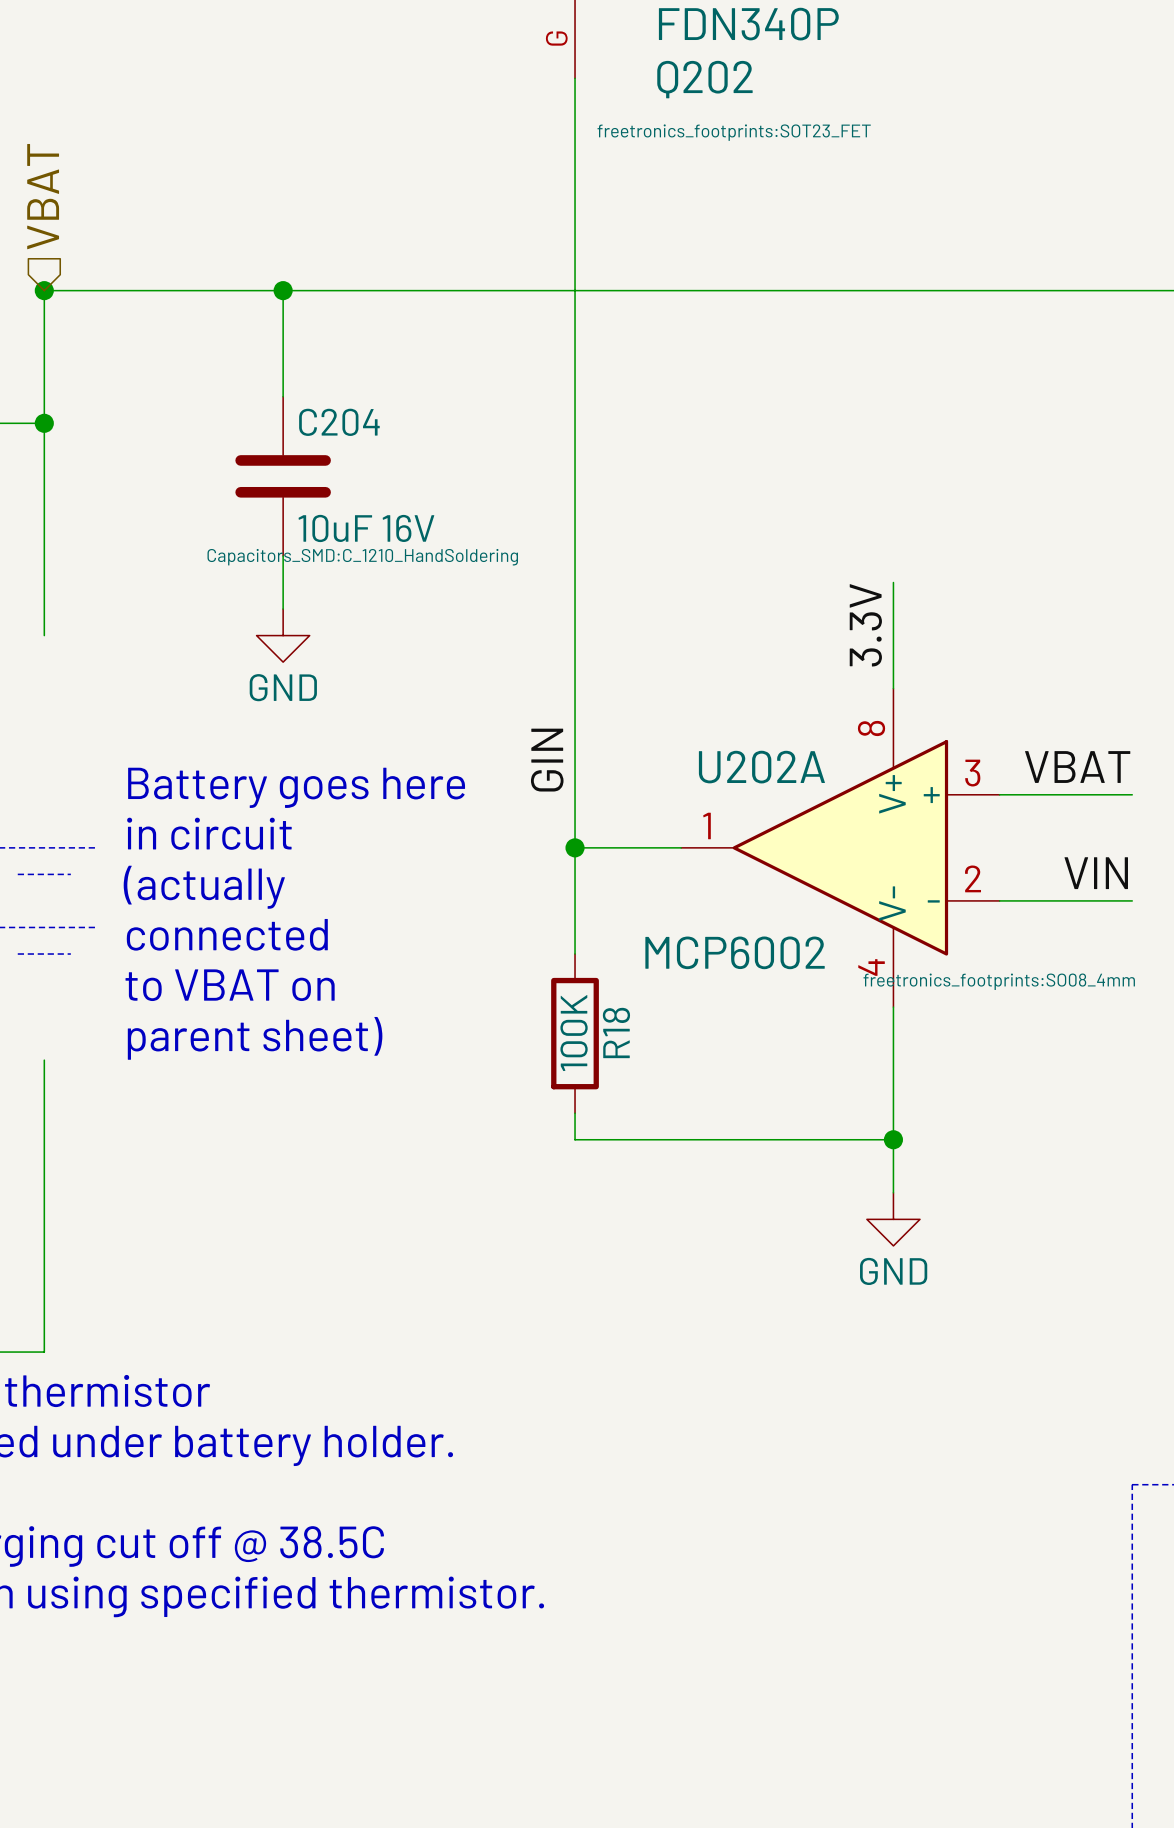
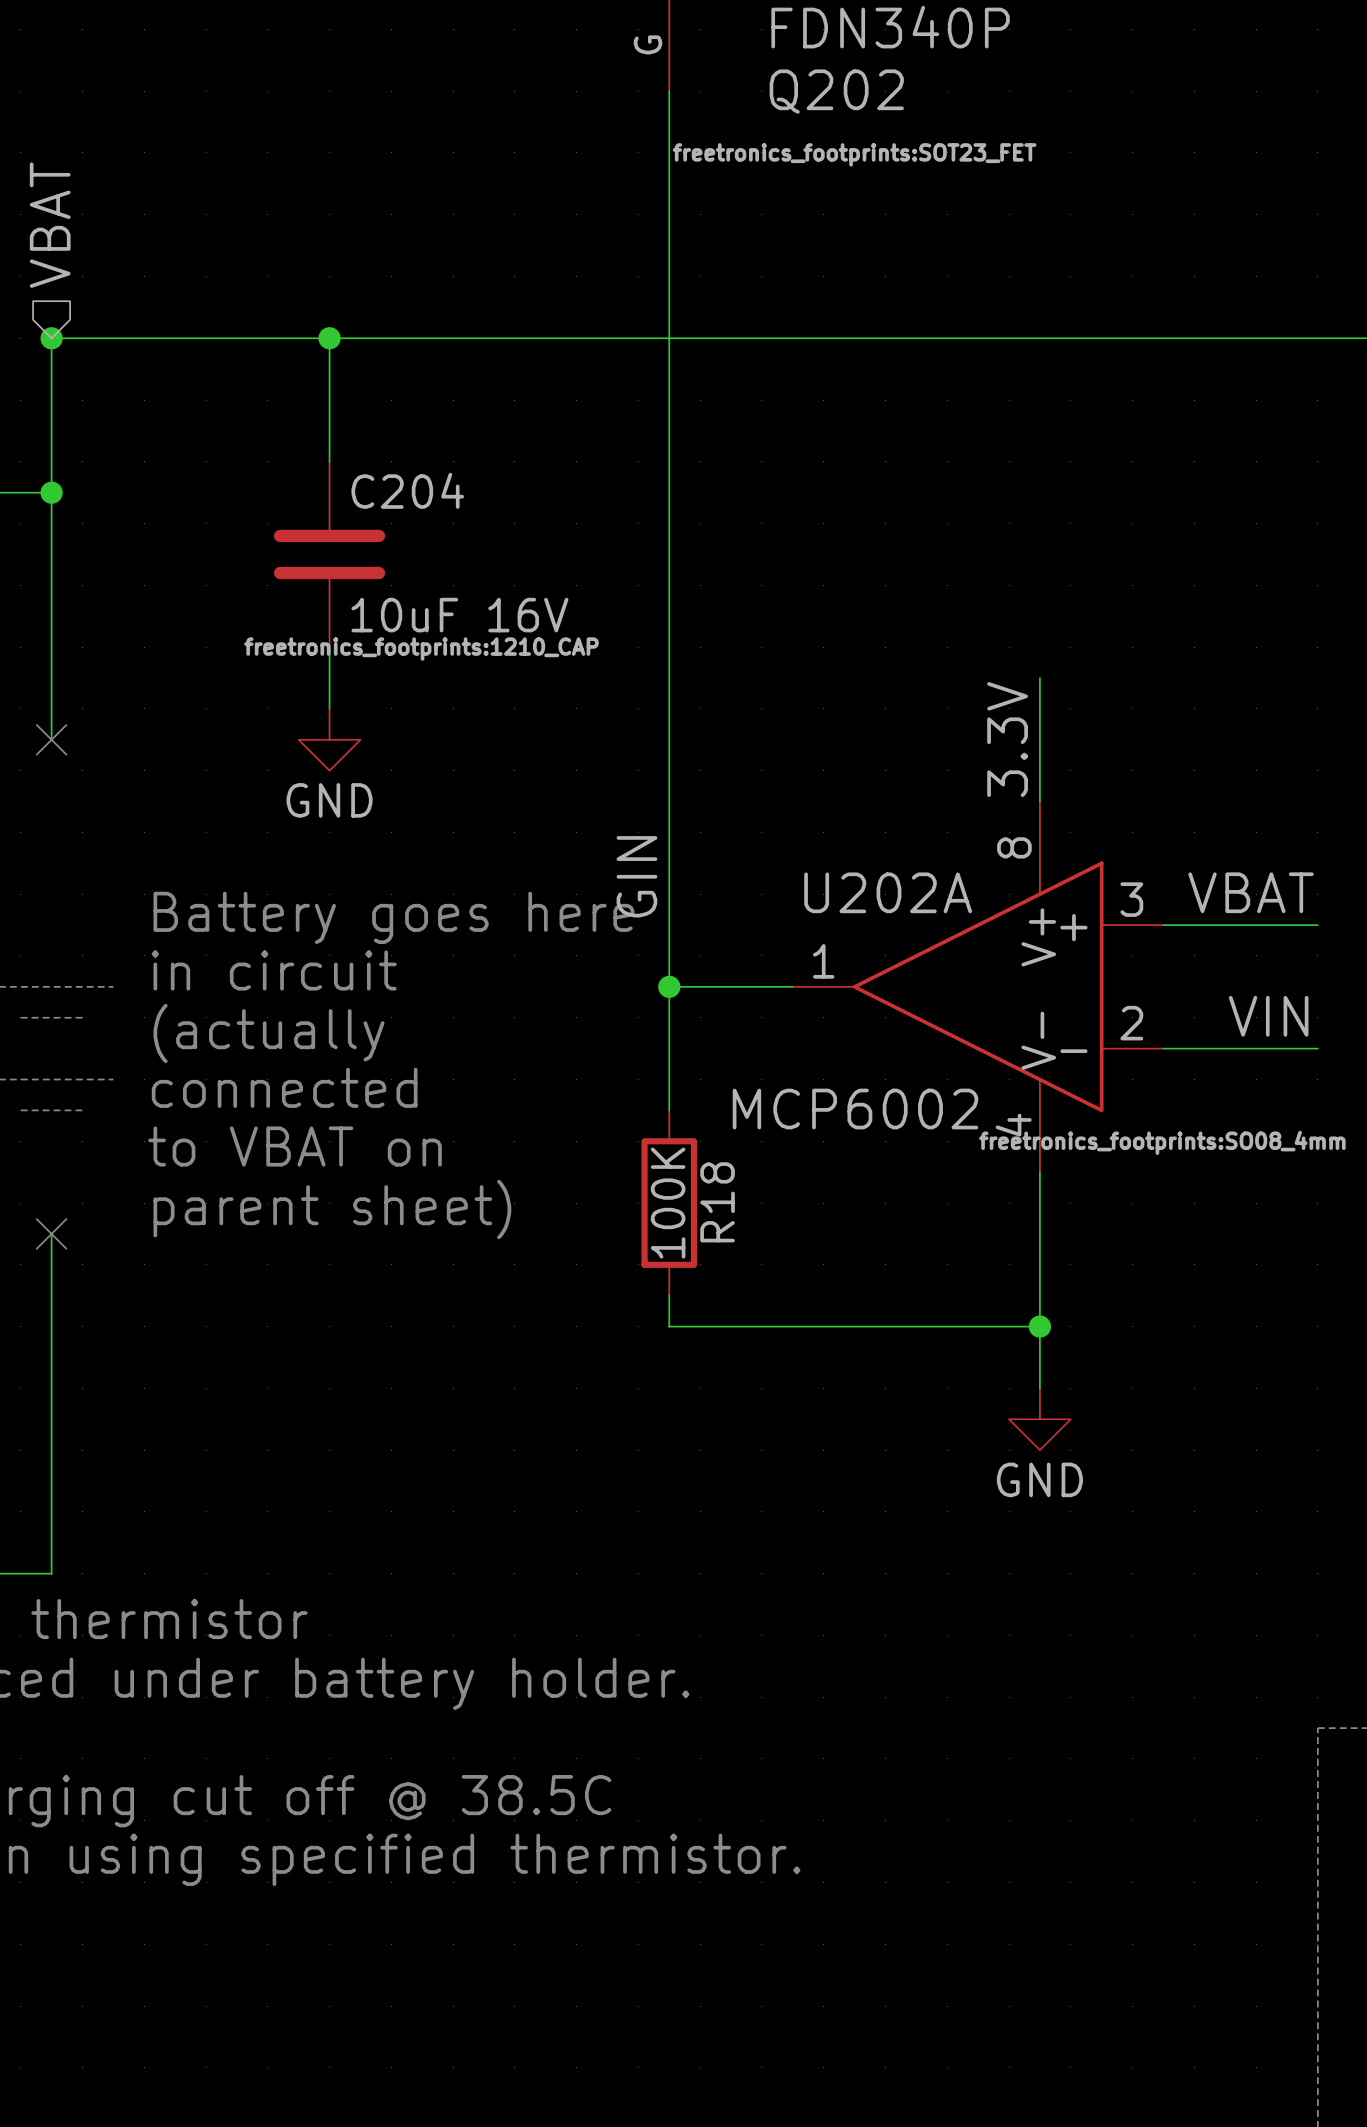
C204 text: Capacitors_SMD:C_1210_HandSoldering (362, 557) -> freetronics_footprints:1210_CAP (421, 649)
no-connect mark: none -> (51, 739)
no-connect mark: none -> (51, 1233)

